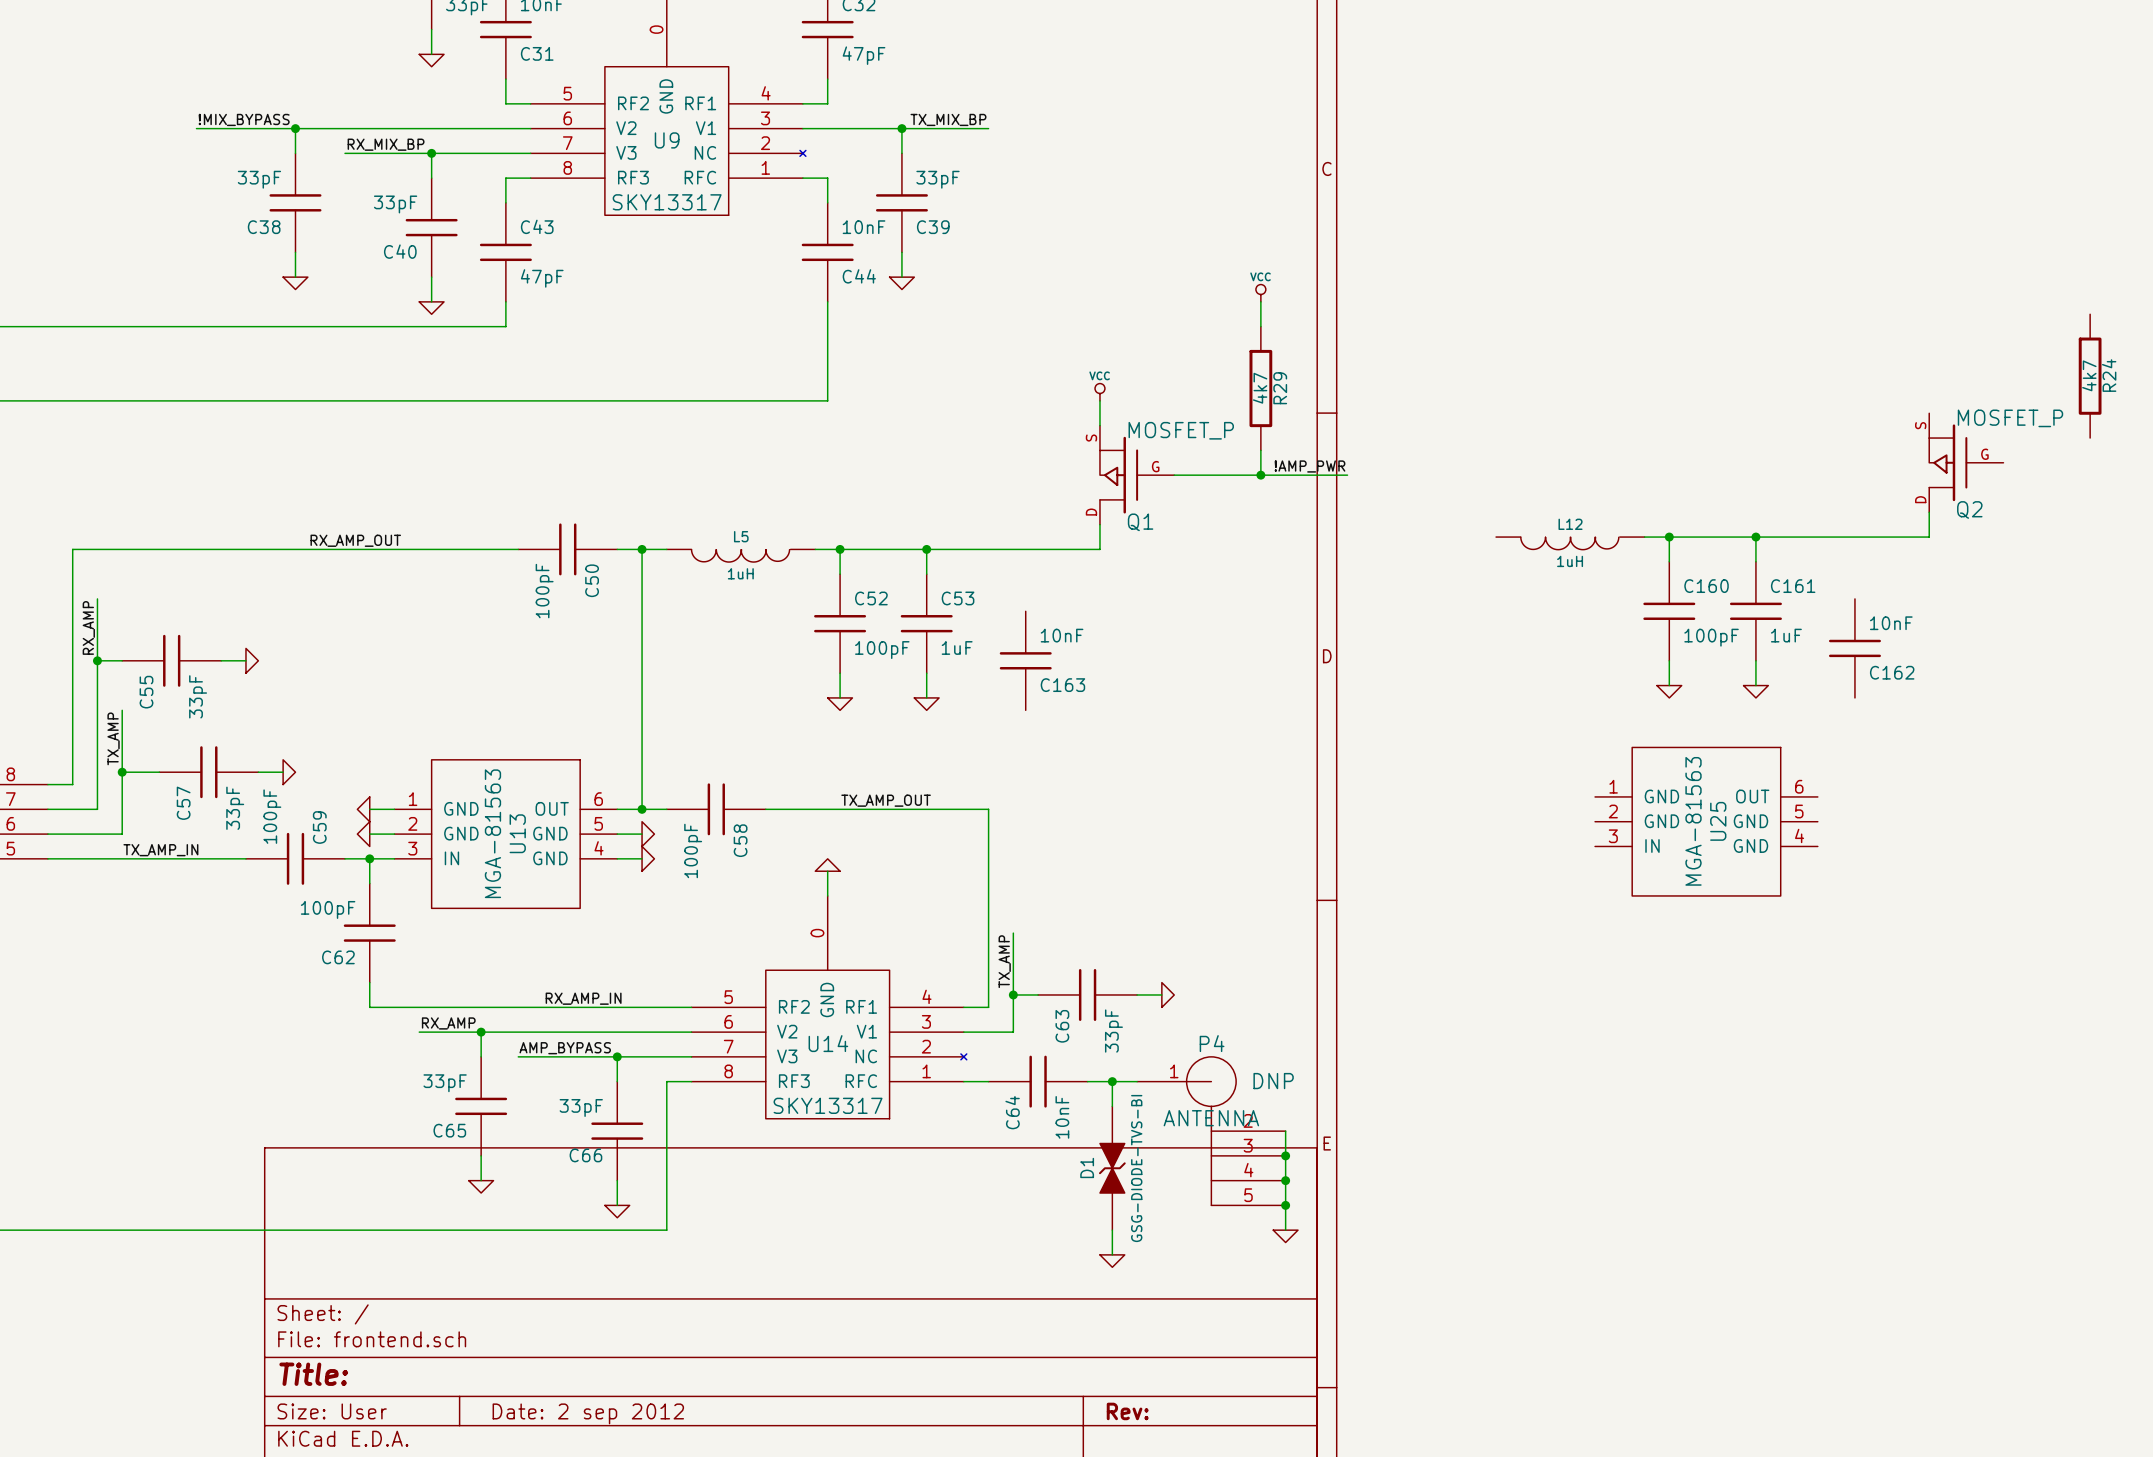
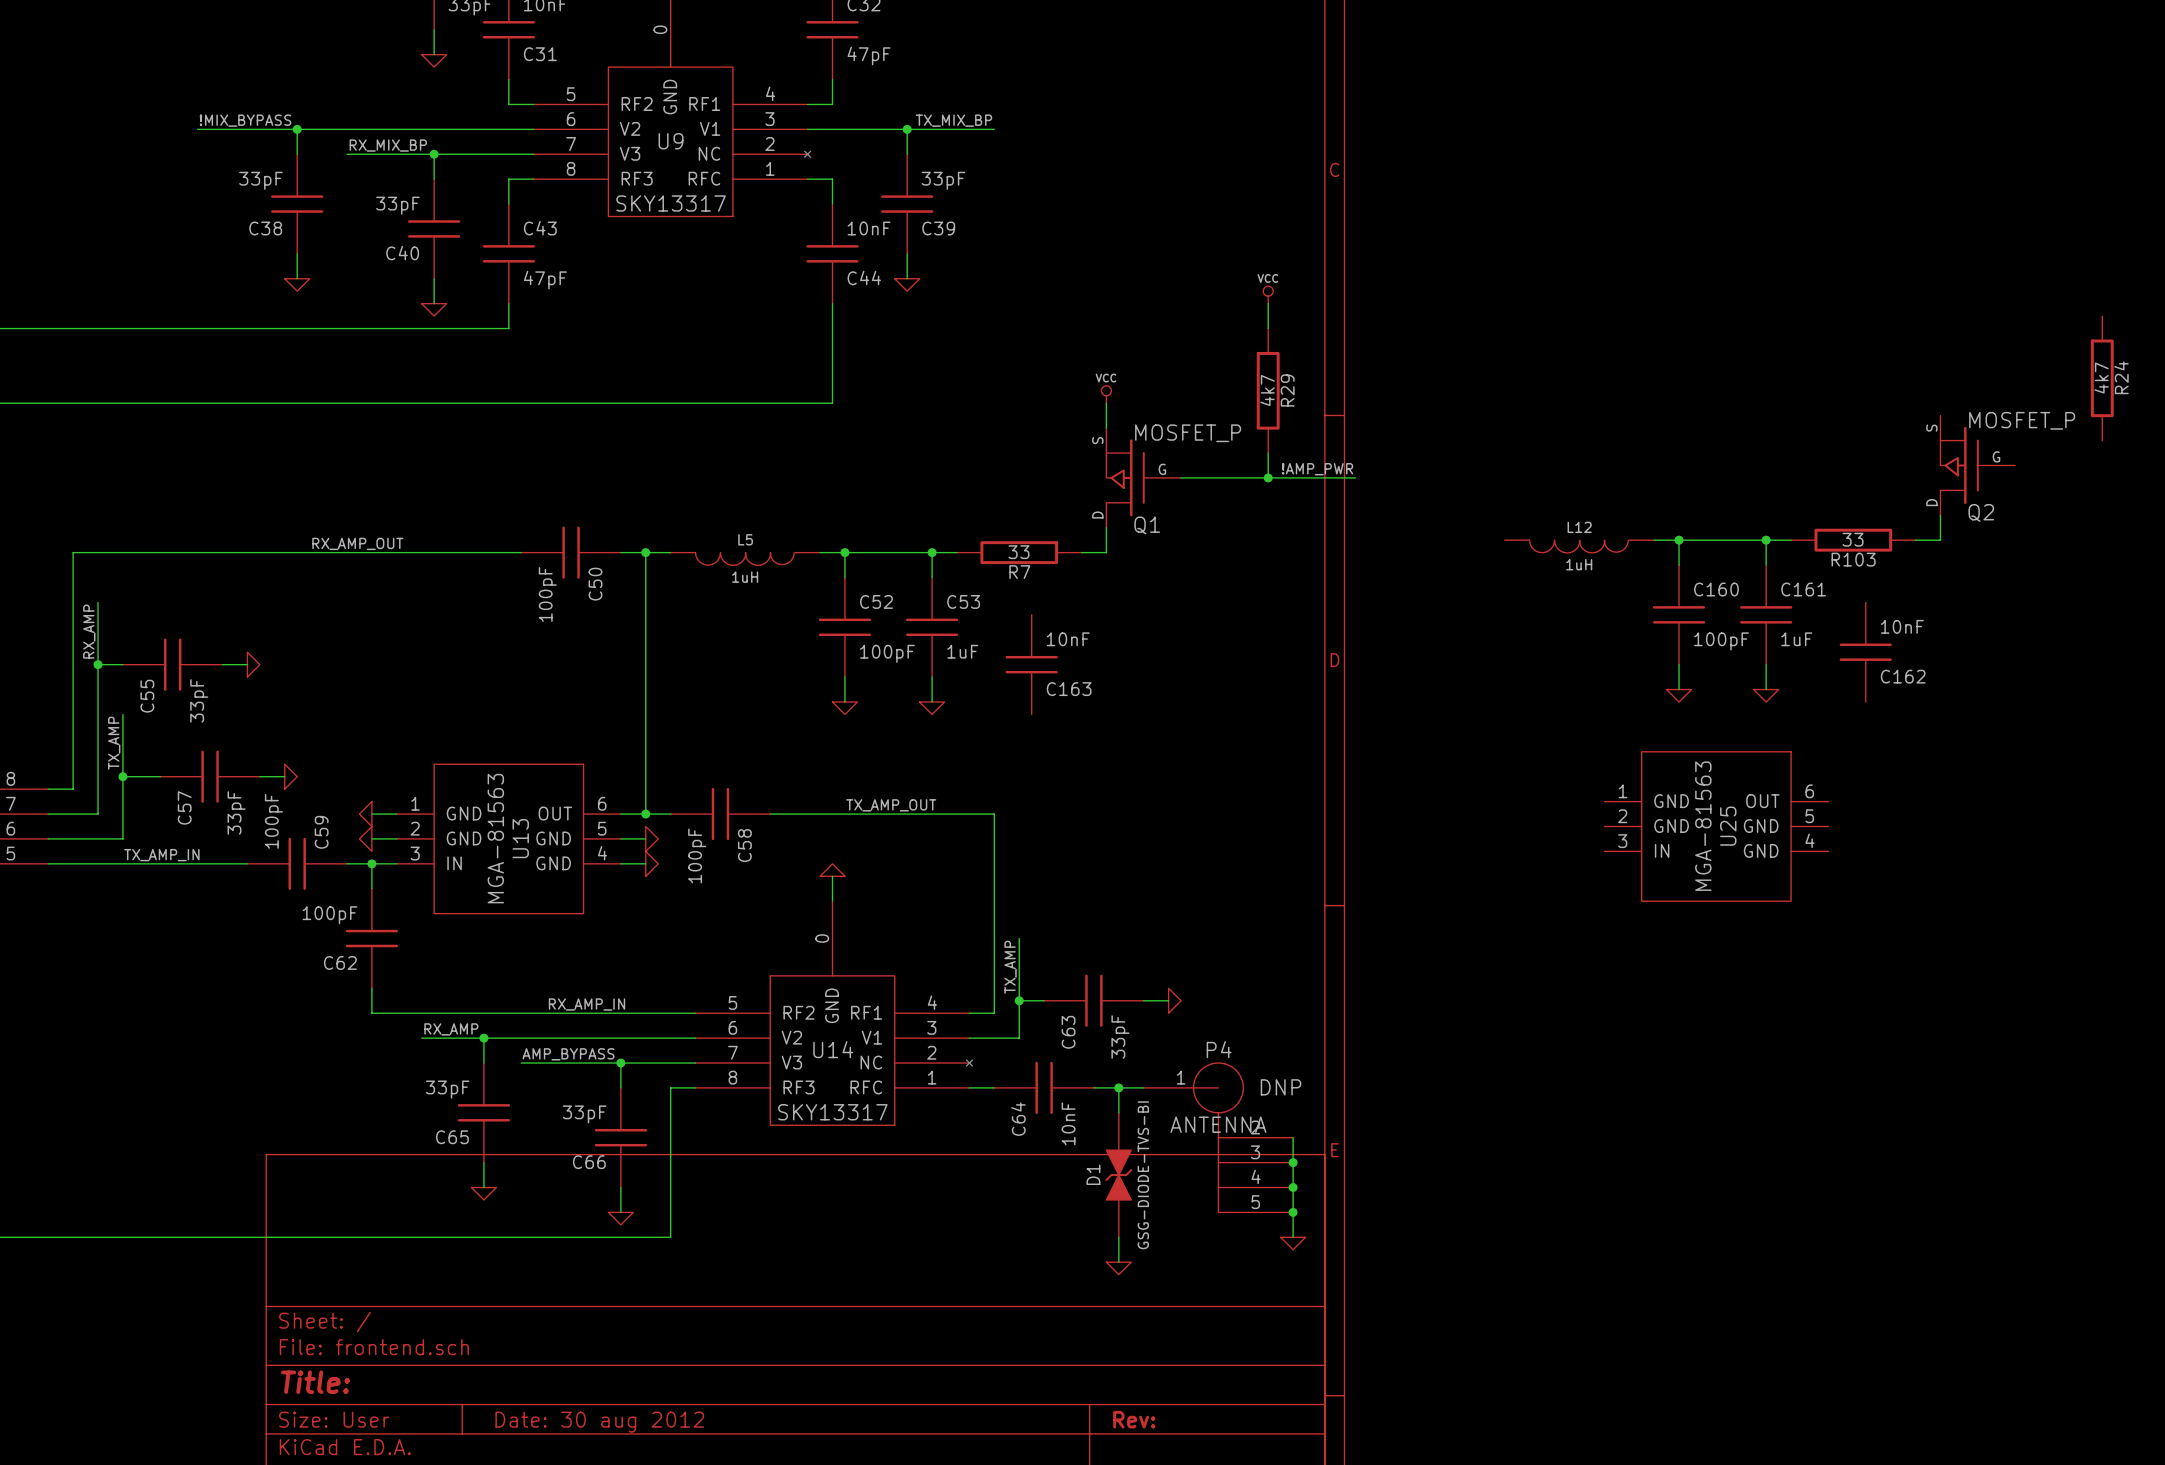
wire: (1780, 537) (1904, 537) -> none
R103: none -> 33 (1853, 540)
wire: (951, 549) (1075, 549) -> none
R7: none -> 33 (1019, 552)
title block: Date: 2 sep 2012 (588, 1413) -> Date: 30 aug 2012 (599, 1422)

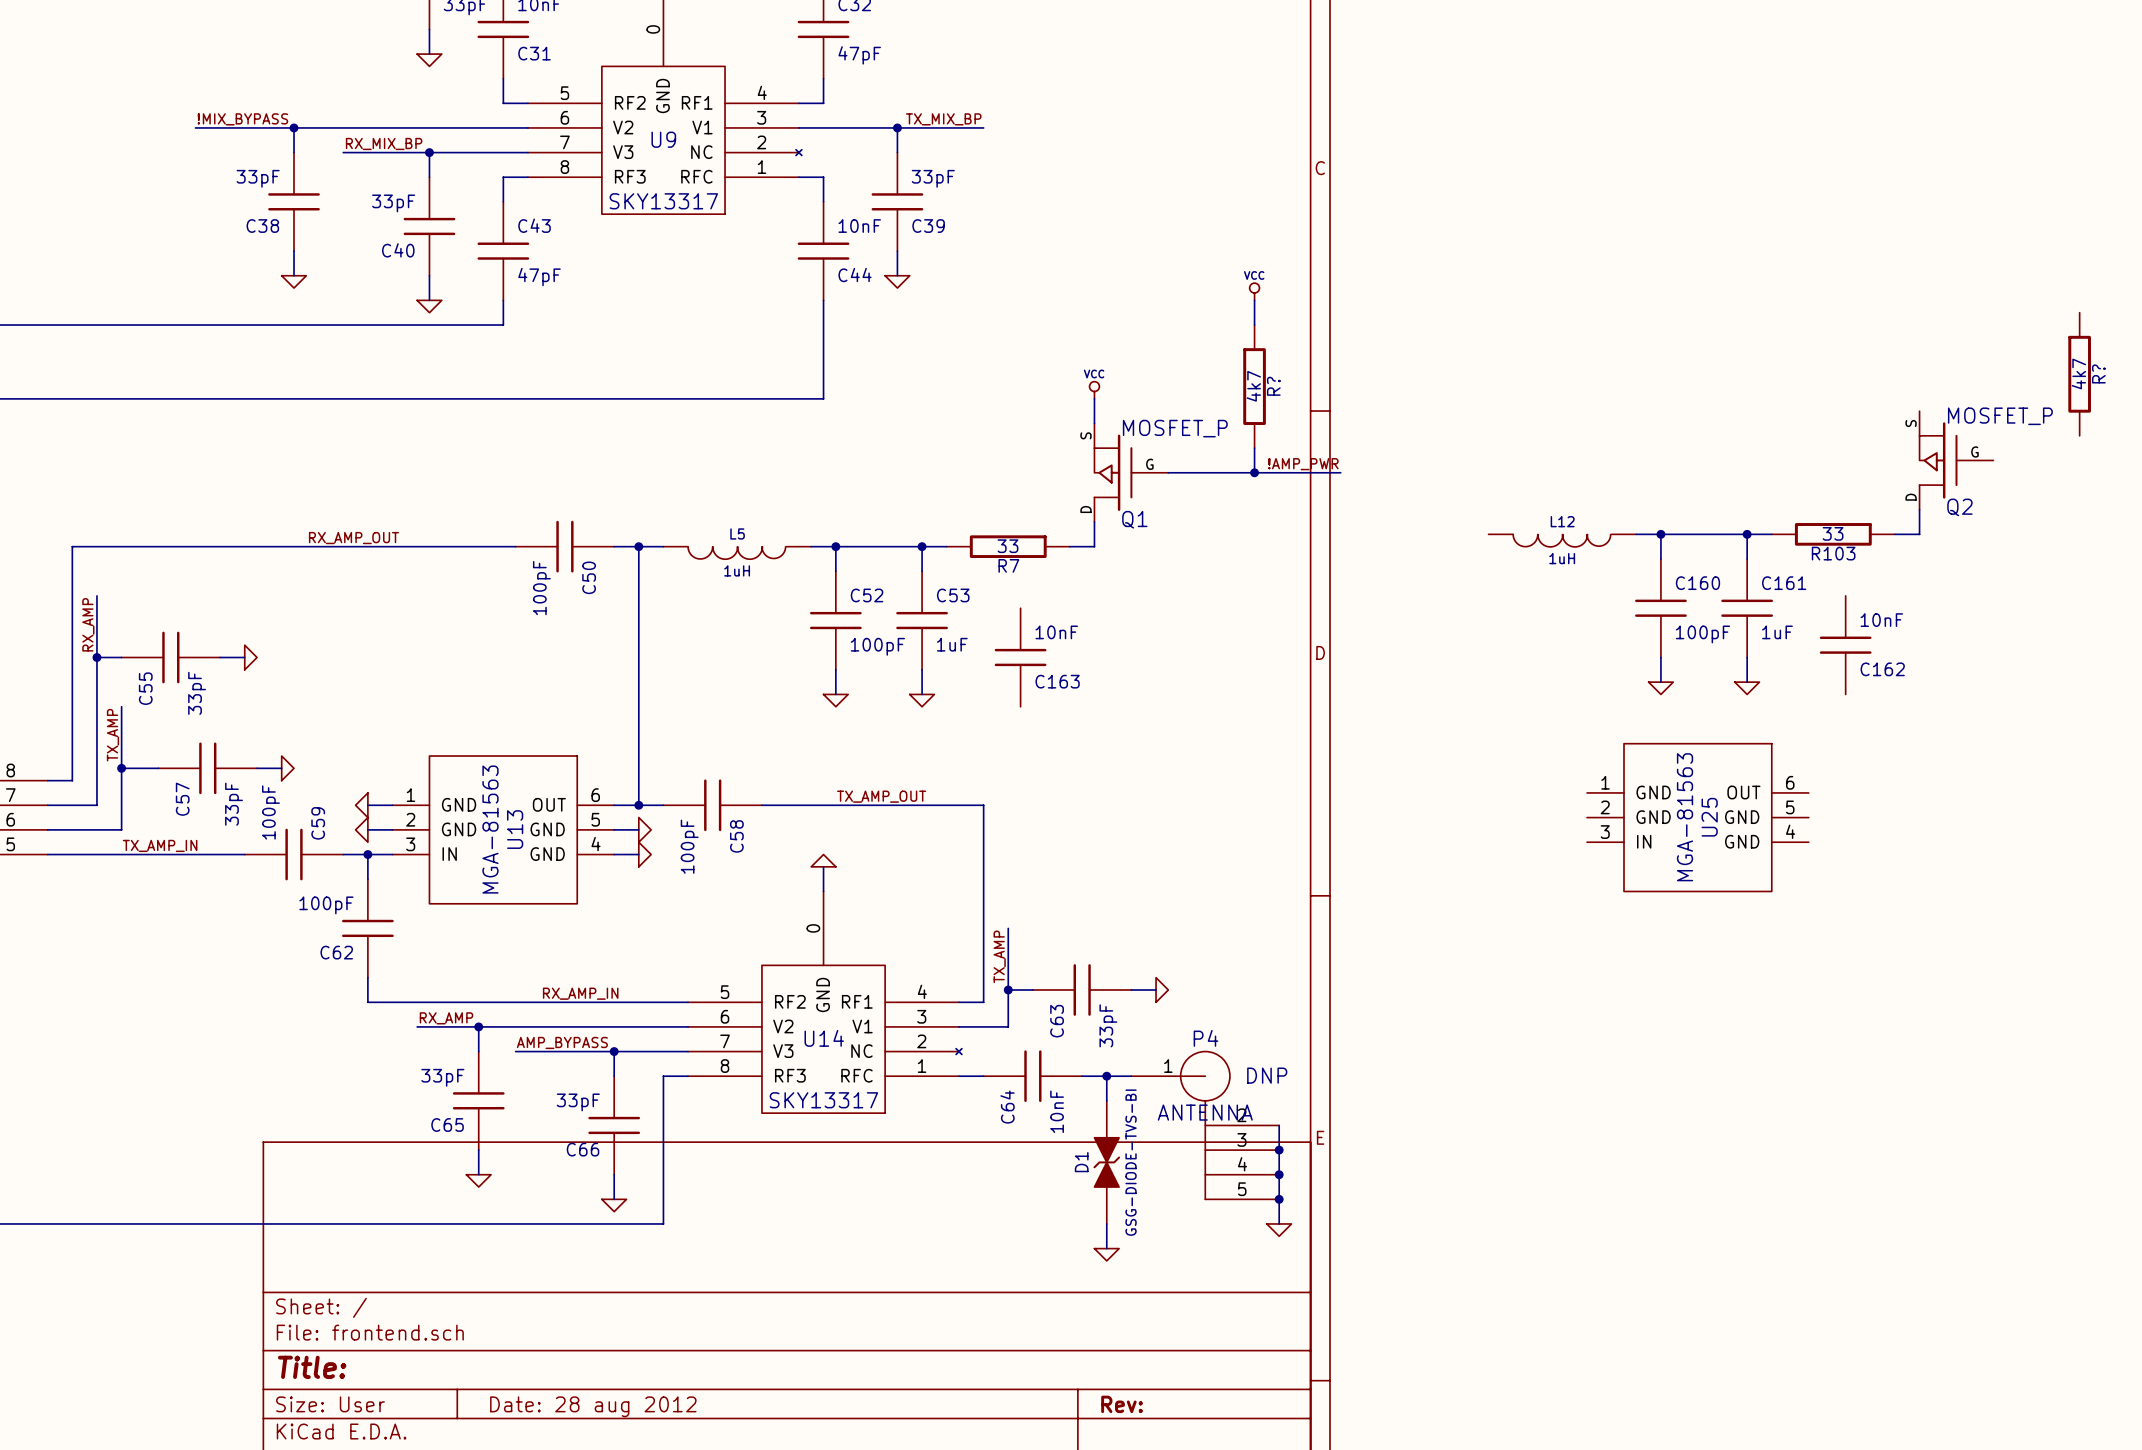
R24 name: R24 (2121, 377) -> R? (2098, 373)
R29 name: R29 (1287, 390) -> R? (1273, 386)
title block: Date: 30 aug 2012 (599, 1422) -> Date: 28 aug 2012 (593, 1406)

